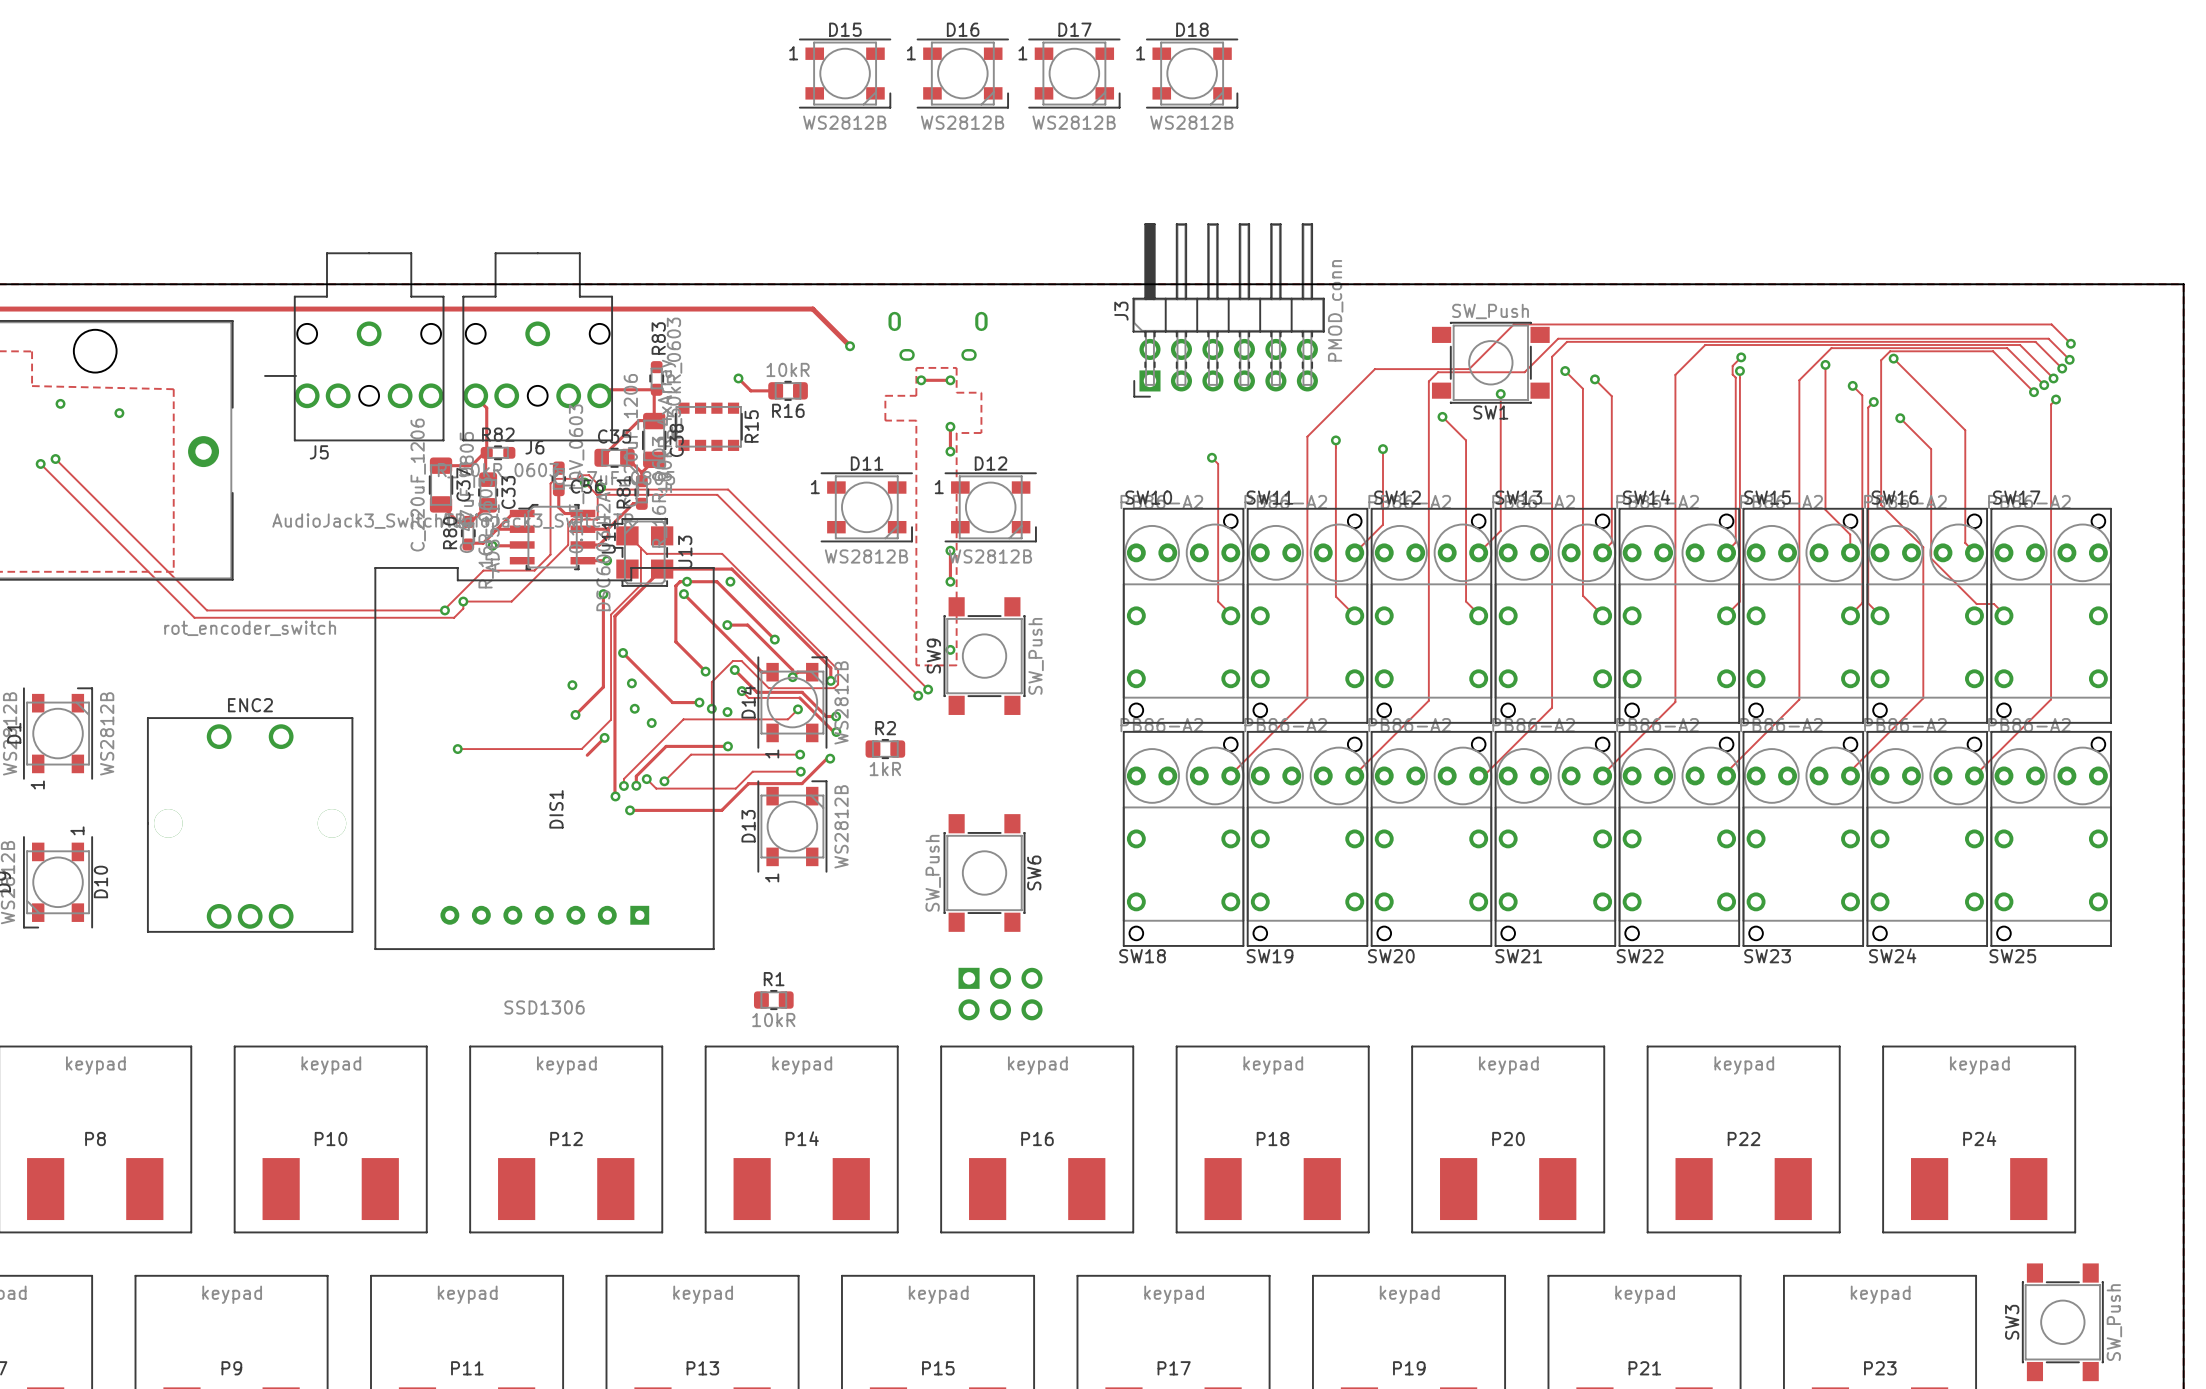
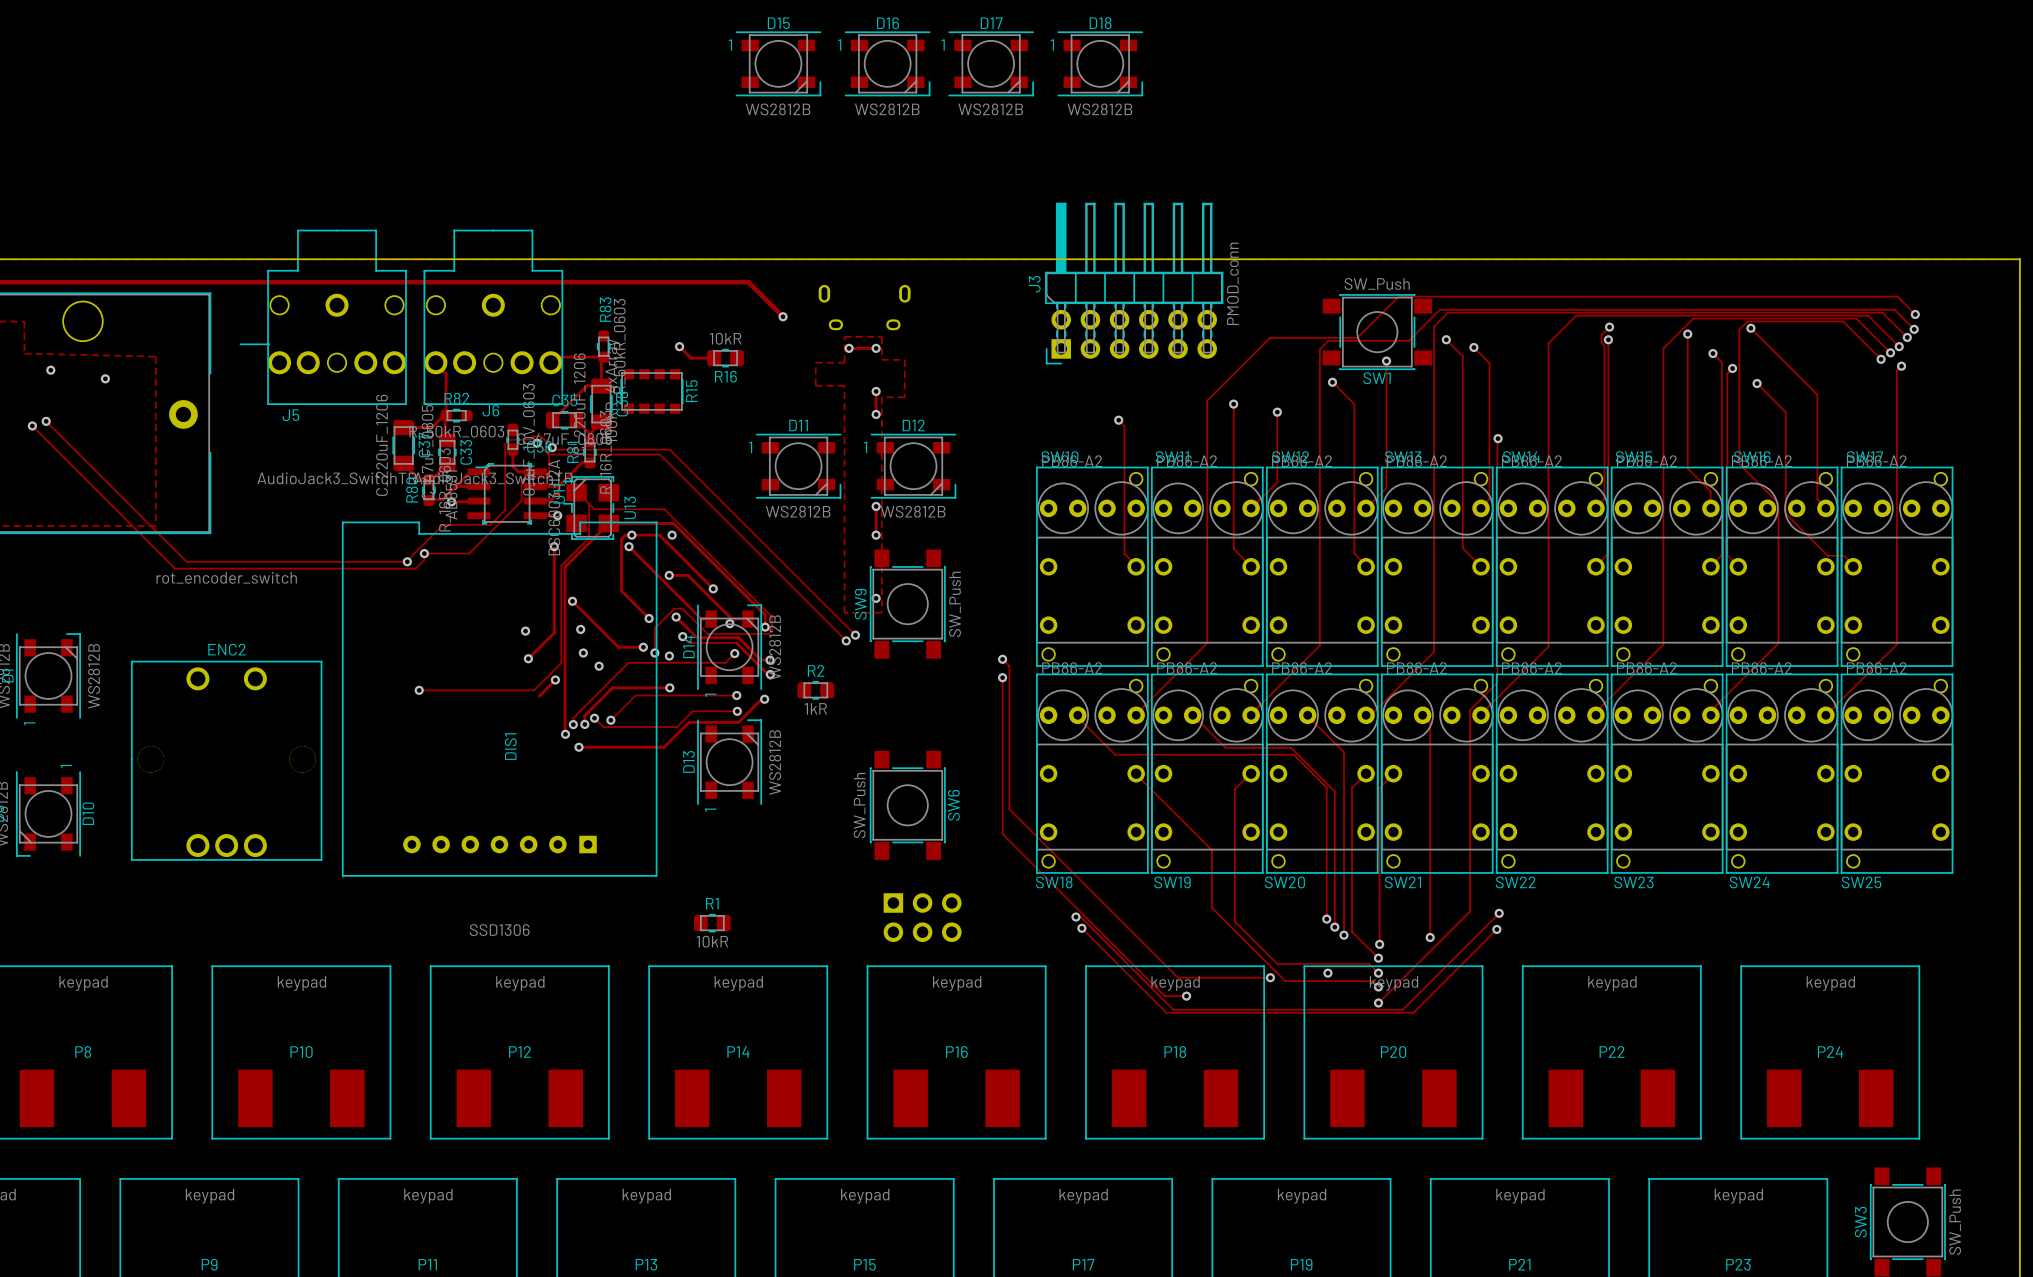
track: none -> (1498, 438) (1497, 682) (1470, 710) (1470, 911) (1378, 1003)
via: none -> (1498, 438)
track: none -> (1002, 659) (1009, 666) (1009, 809) (1178, 977) (1270, 977)
via: none -> (1002, 659)
track: none -> (1002, 677) (1002, 834) (1164, 996) (1186, 996)
via: none -> (1002, 677)
track: none -> (1075, 714) (1115, 754) (1293, 754) (1326, 787) (1326, 919)
track: none -> (1193, 714) (1225, 747) (1291, 747) (1334, 791) (1334, 927)
track: none -> (1307, 715) (1344, 752) (1344, 935)
track: none -> (1423, 715) (1430, 722) (1430, 937)
track: none -> (1250, 773) (1234, 789) (1234, 921) (1277, 963) (1369, 963) (1378, 973)
track: none -> (1366, 773) (1352, 788) (1352, 931) (1378, 958)
track: none -> (1135, 774) (1211, 850) (1211, 907) (1285, 981) (1372, 981) (1378, 986)
track: none -> (1393, 774) (1379, 788) (1379, 944)
track: none -> (1499, 913) (1402, 1009) (1173, 1009) (1080, 917) (1075, 917)
via: none -> (1499, 913)
via: none -> (1075, 917)
via: none -> (1326, 919)
via: none -> (1334, 927)
track: none -> (1081, 928) (1166, 1012) (1413, 1012) (1496, 929)
via: none -> (1081, 928)
via: none -> (1496, 929)
via: none -> (1344, 935)
via: none -> (1430, 937)
via: none -> (1379, 944)
via: none -> (1378, 958)
via: none -> (1327, 973)
via: none -> (1378, 973)
via: none -> (1270, 977)
via: none -> (1378, 986)
via: none -> (1186, 996)
via: none -> (1378, 1003)

